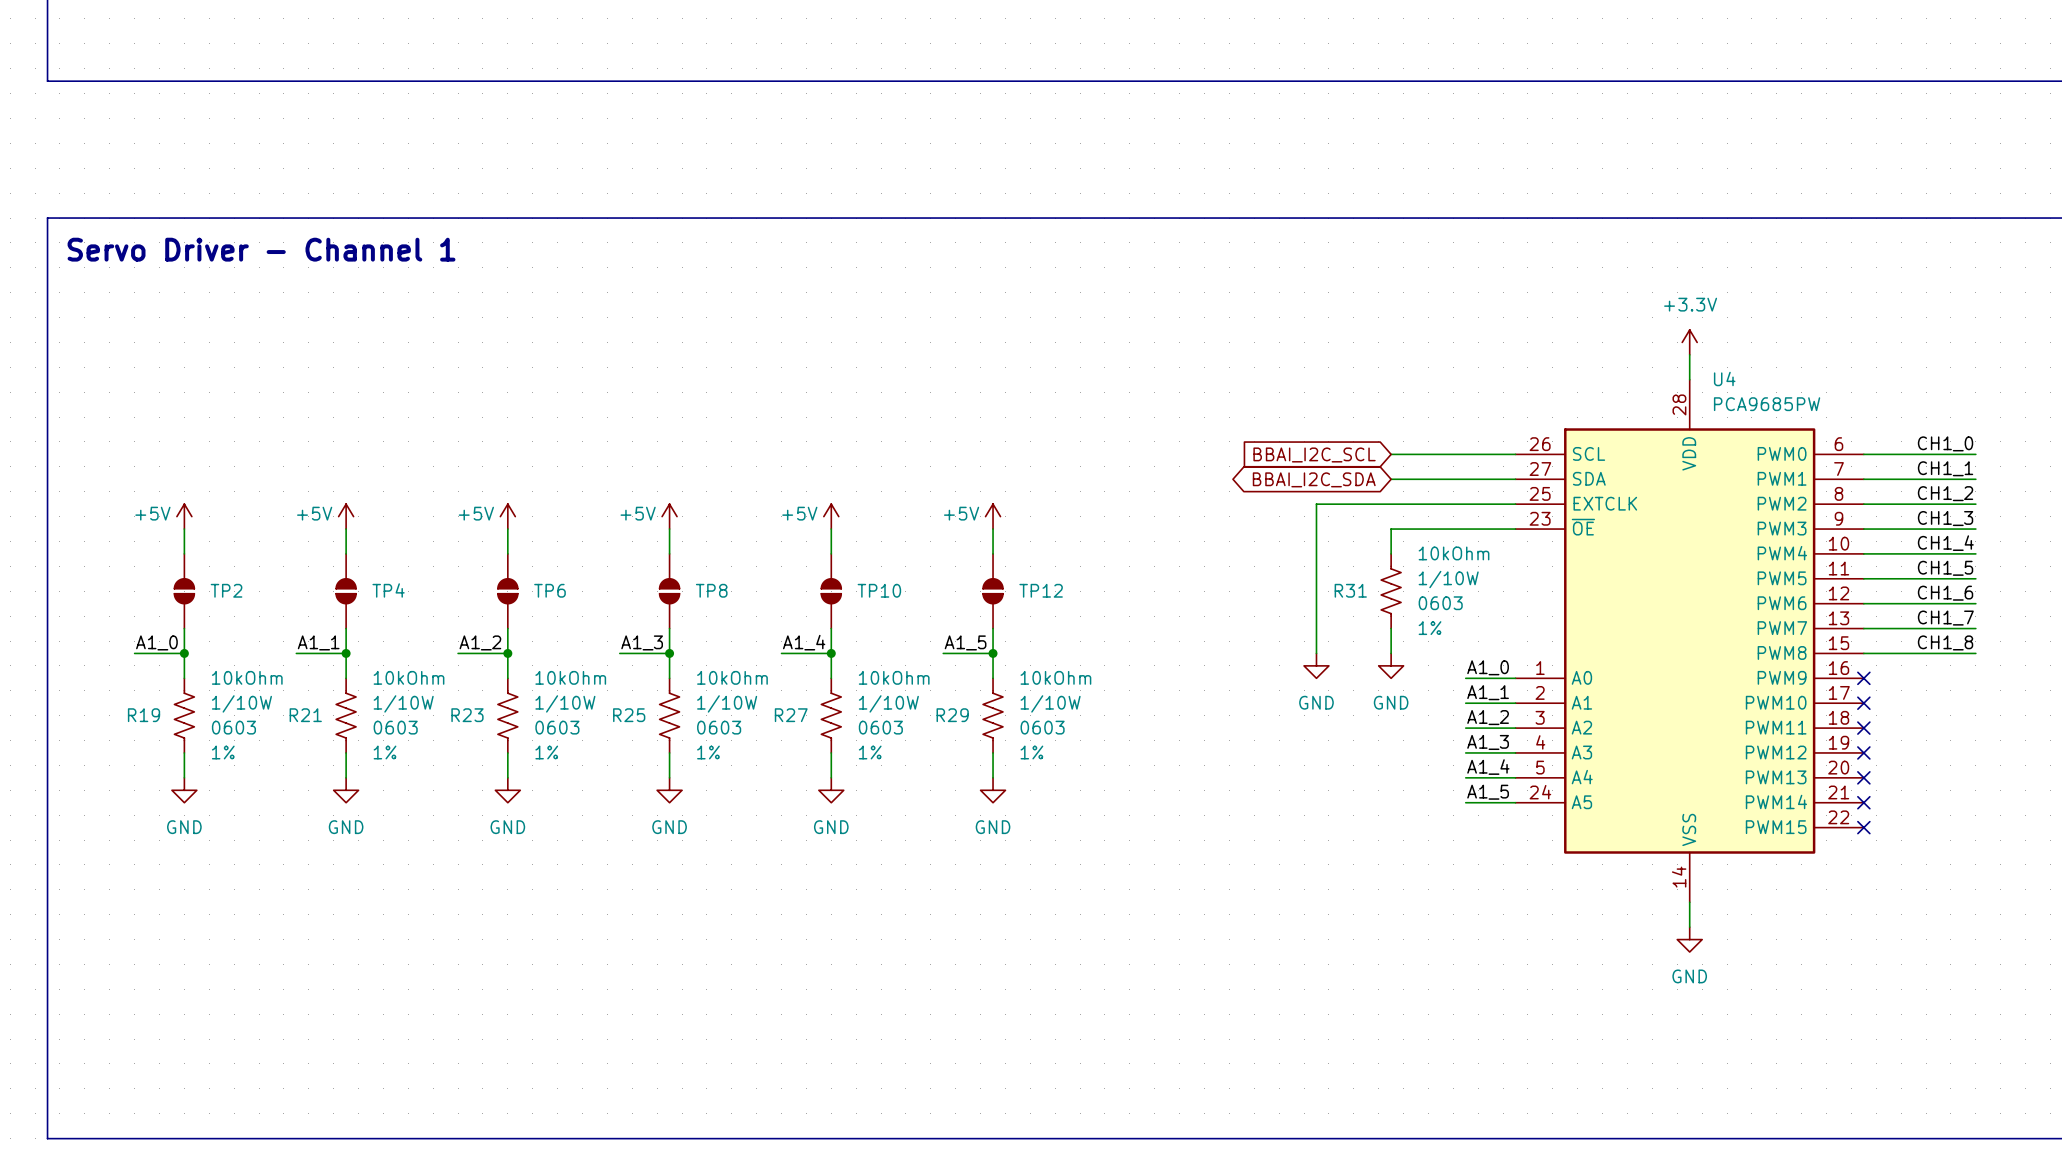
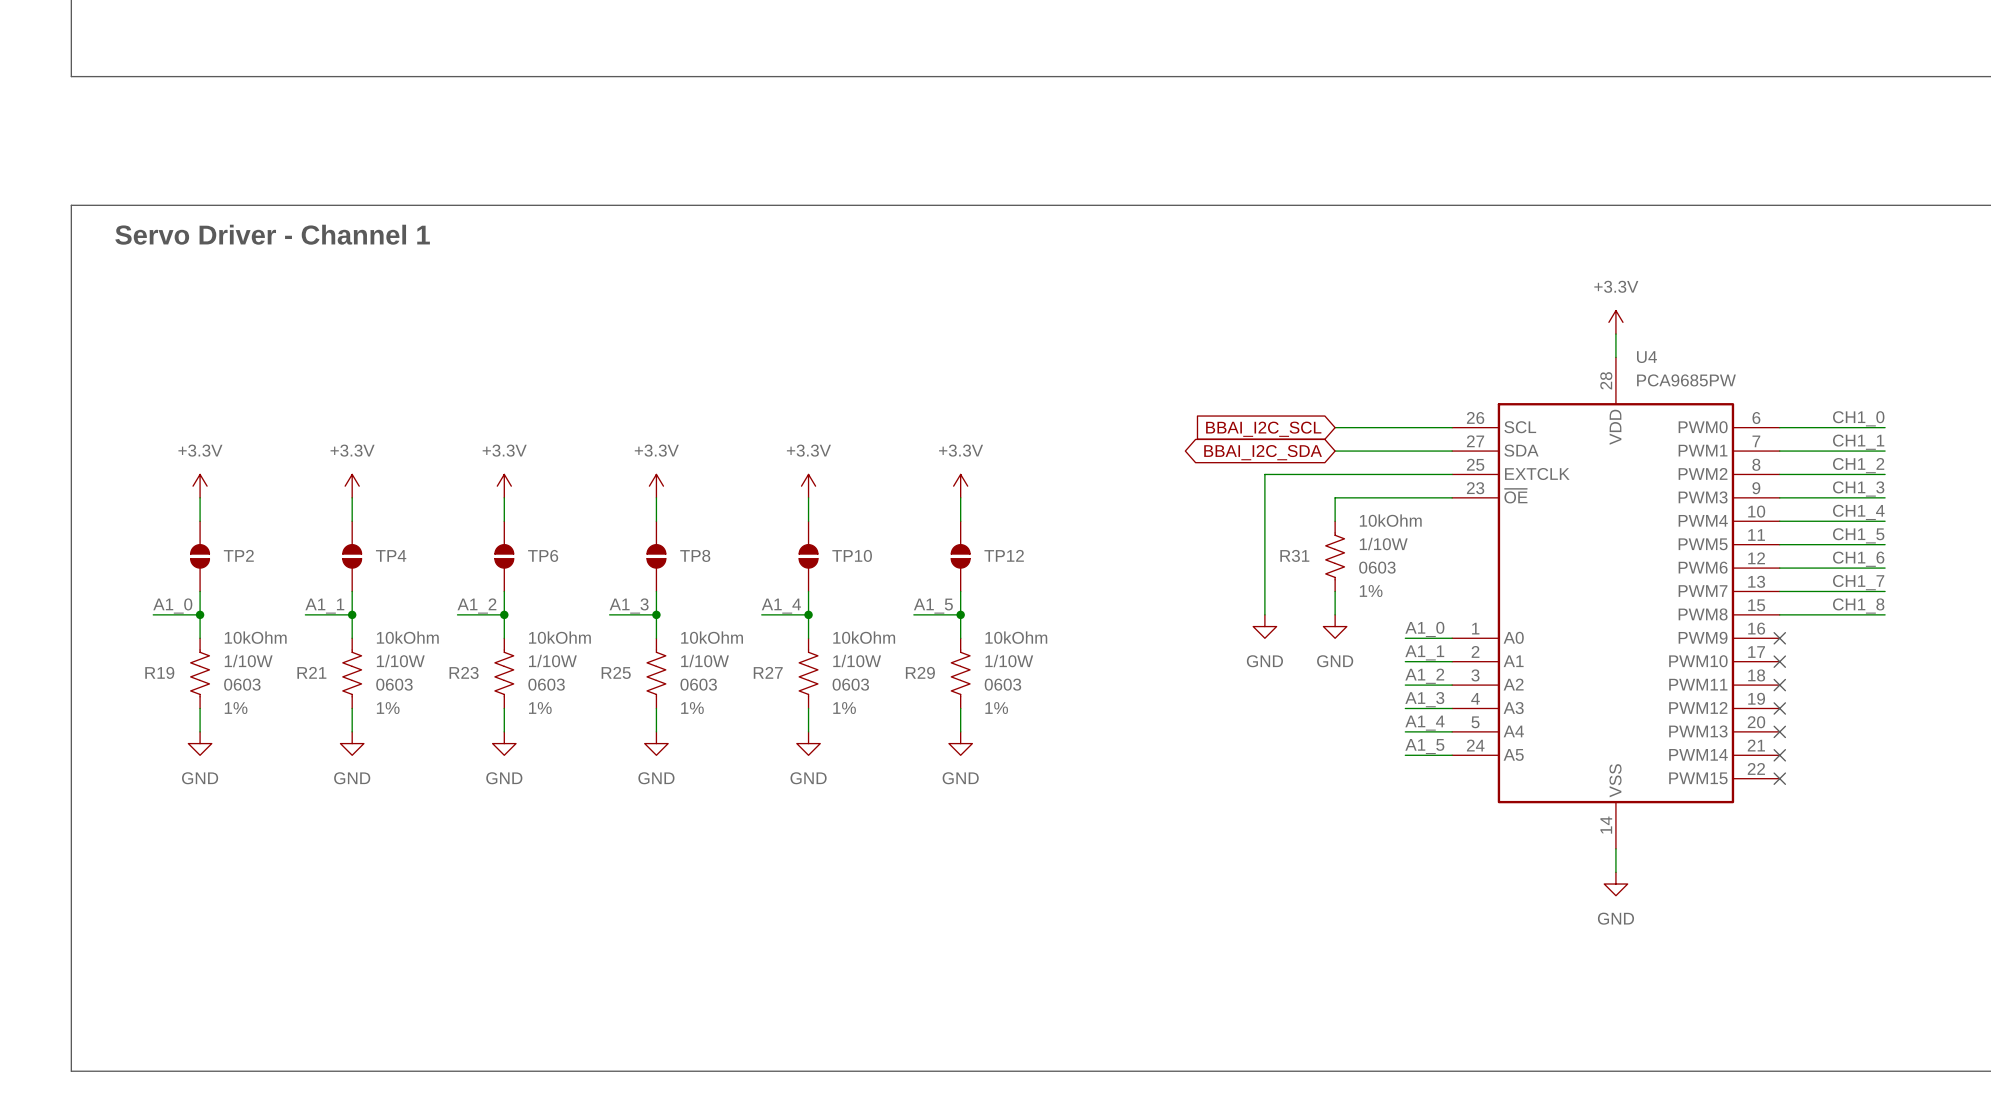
power symbol: +5V (184, 516) -> +3.3V (200, 486)
power symbol: +5V (346, 516) -> +3.3V (352, 486)
power symbol: +5V (507, 516) -> +3.3V (504, 486)
power symbol: +5V (669, 516) -> +3.3V (656, 486)
power symbol: +5V (831, 516) -> +3.3V (808, 486)
power symbol: +5V (993, 516) -> +3.3V (960, 486)

